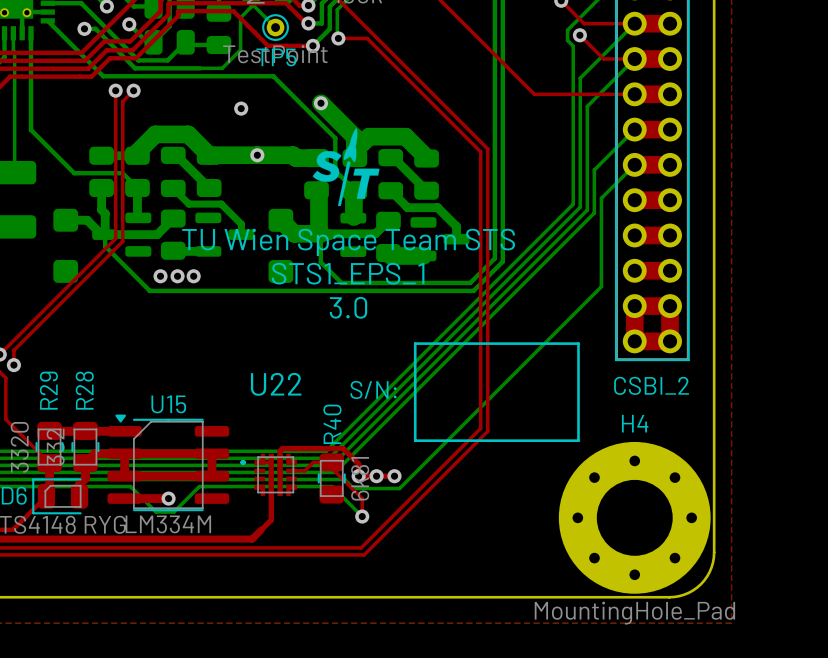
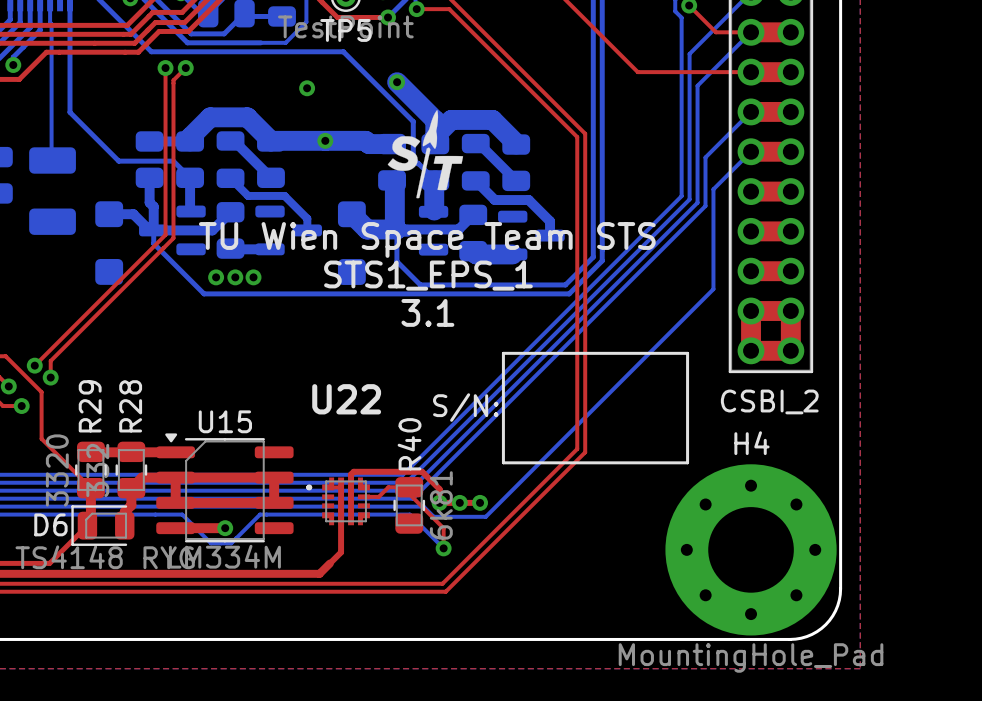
text: 3.0 (348, 307) -> 3.1 (427, 312)

